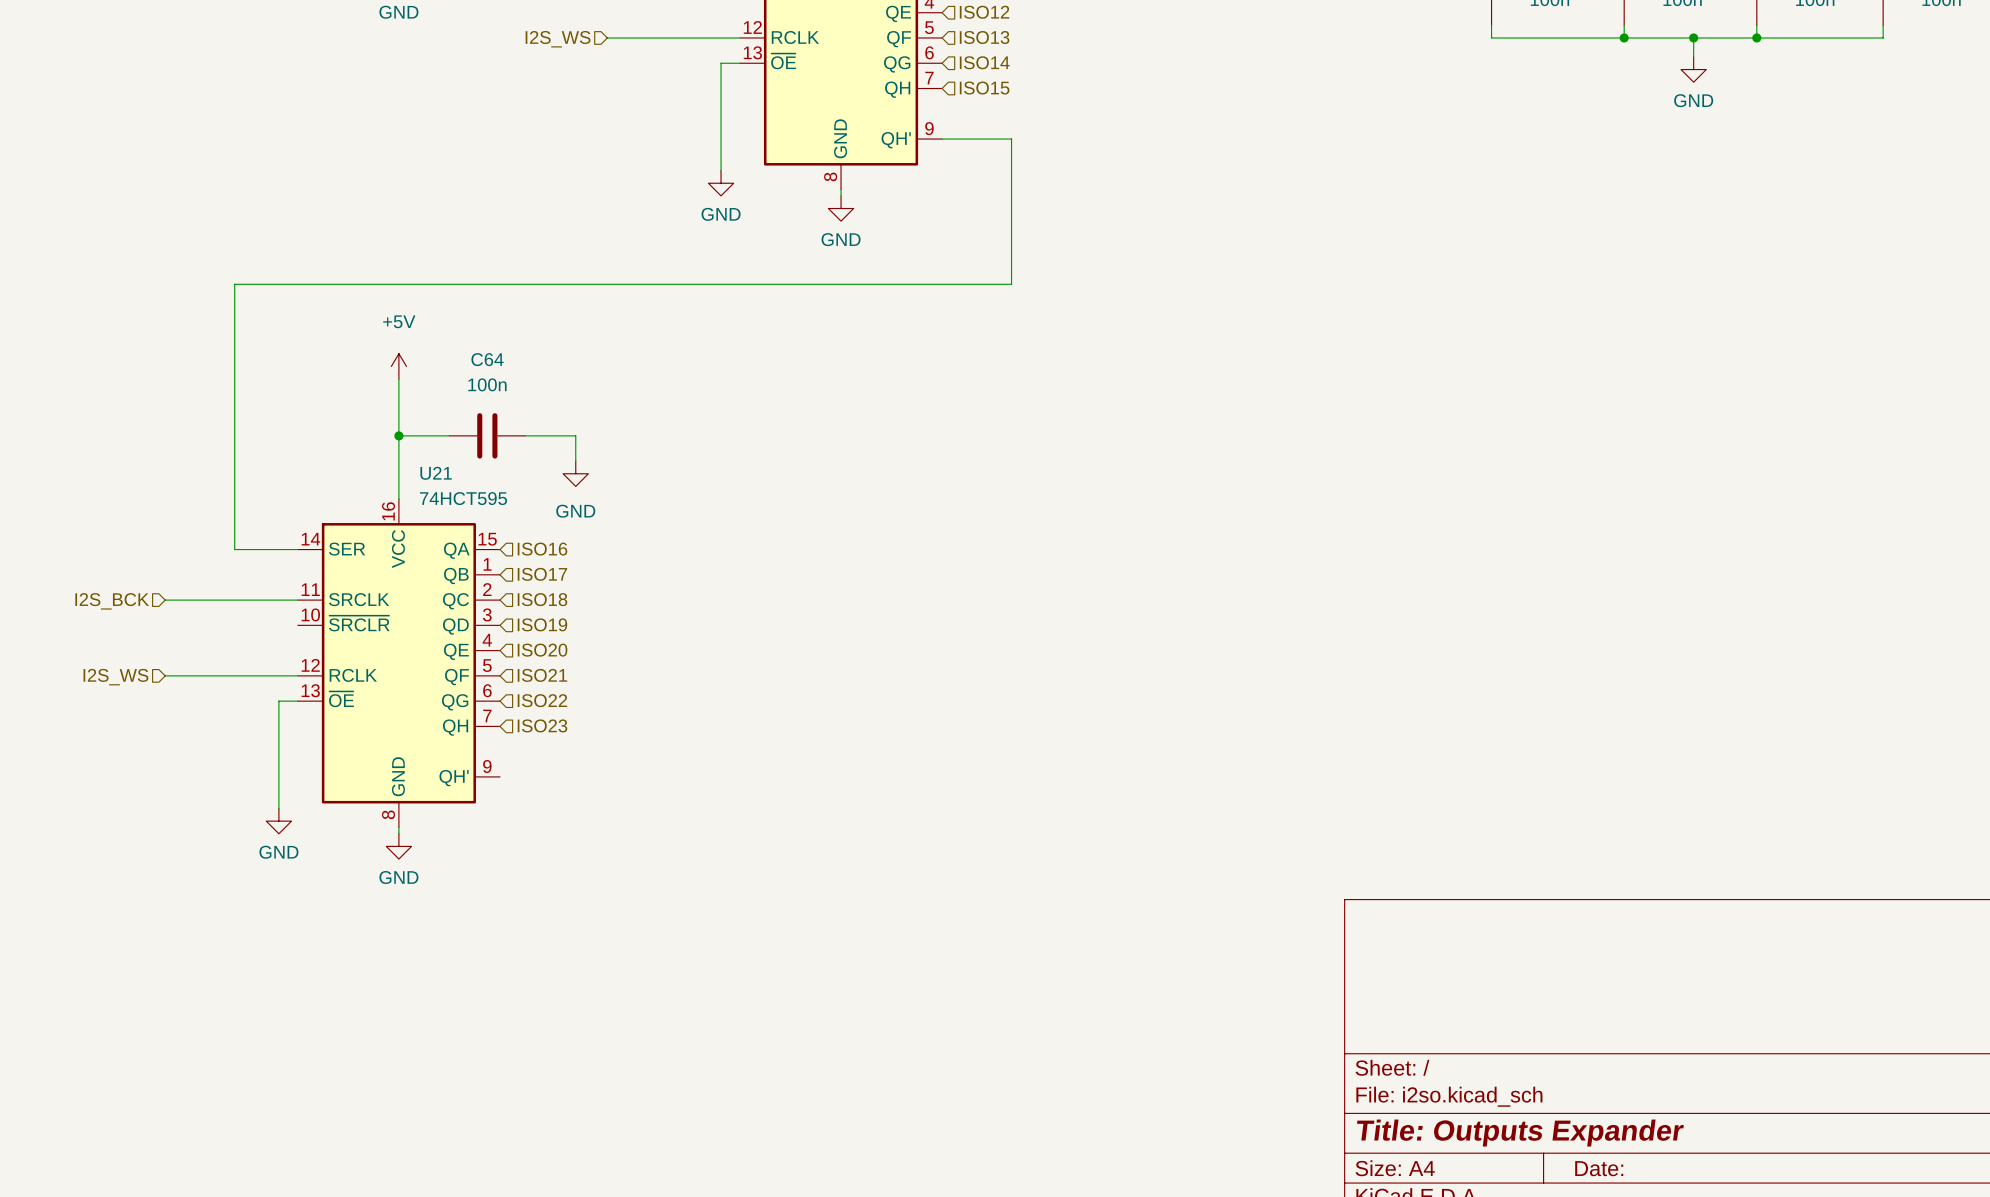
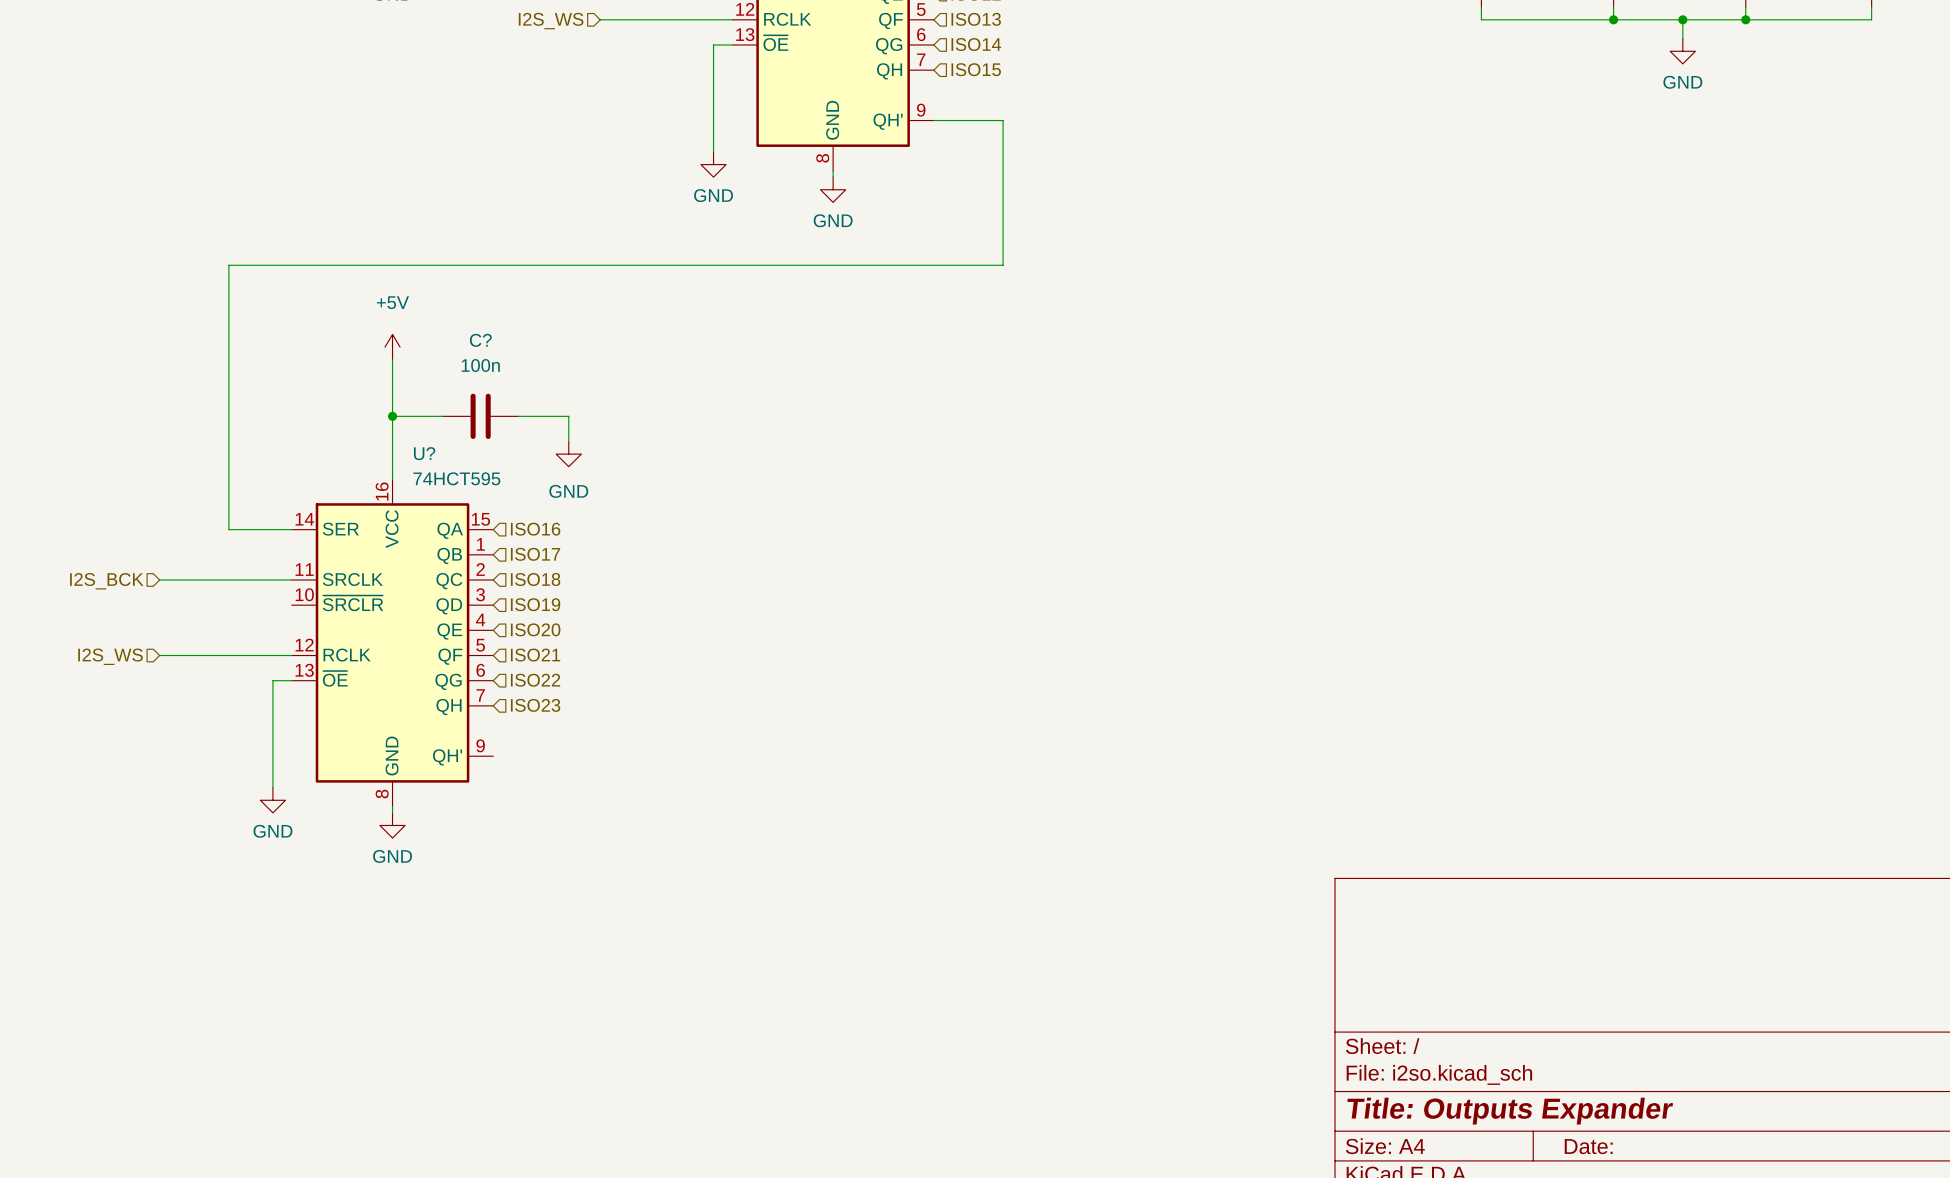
C64 name: C64 (487, 359) -> C? (480, 340)
U21 name: U21 (436, 473) -> U? (424, 453)

